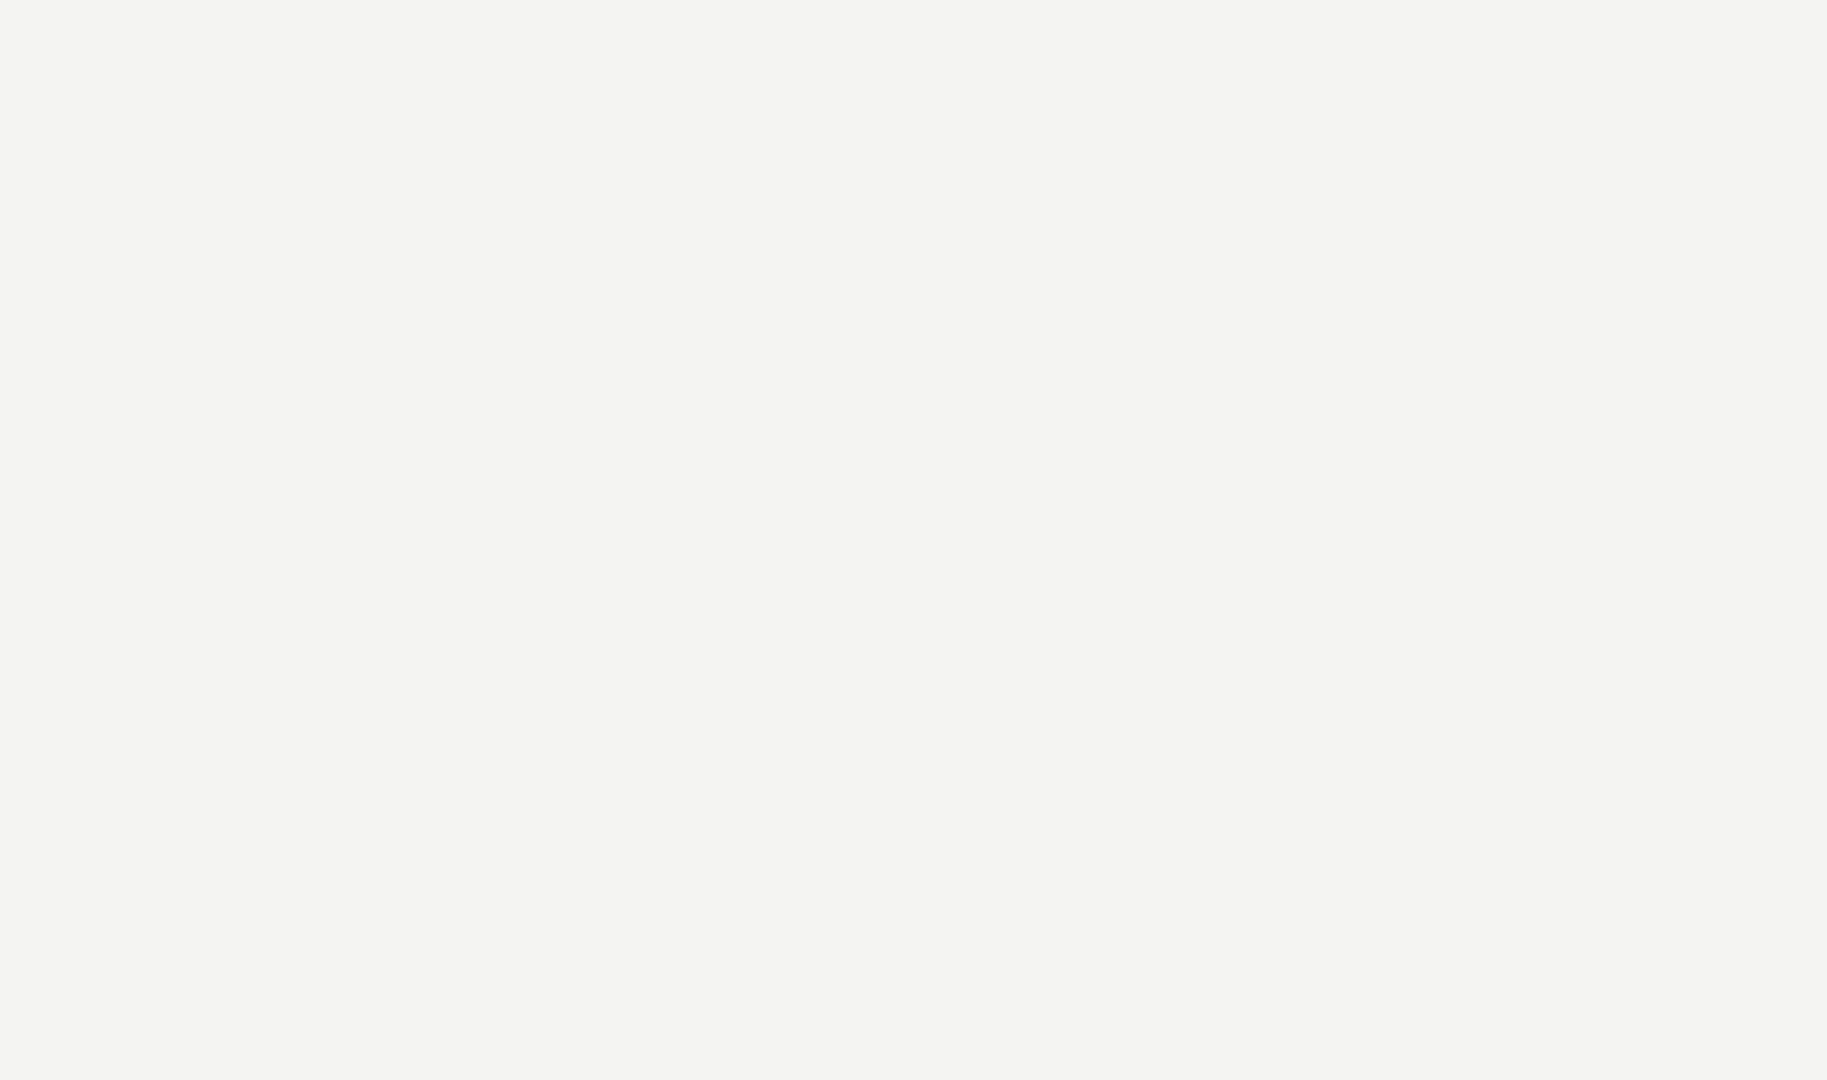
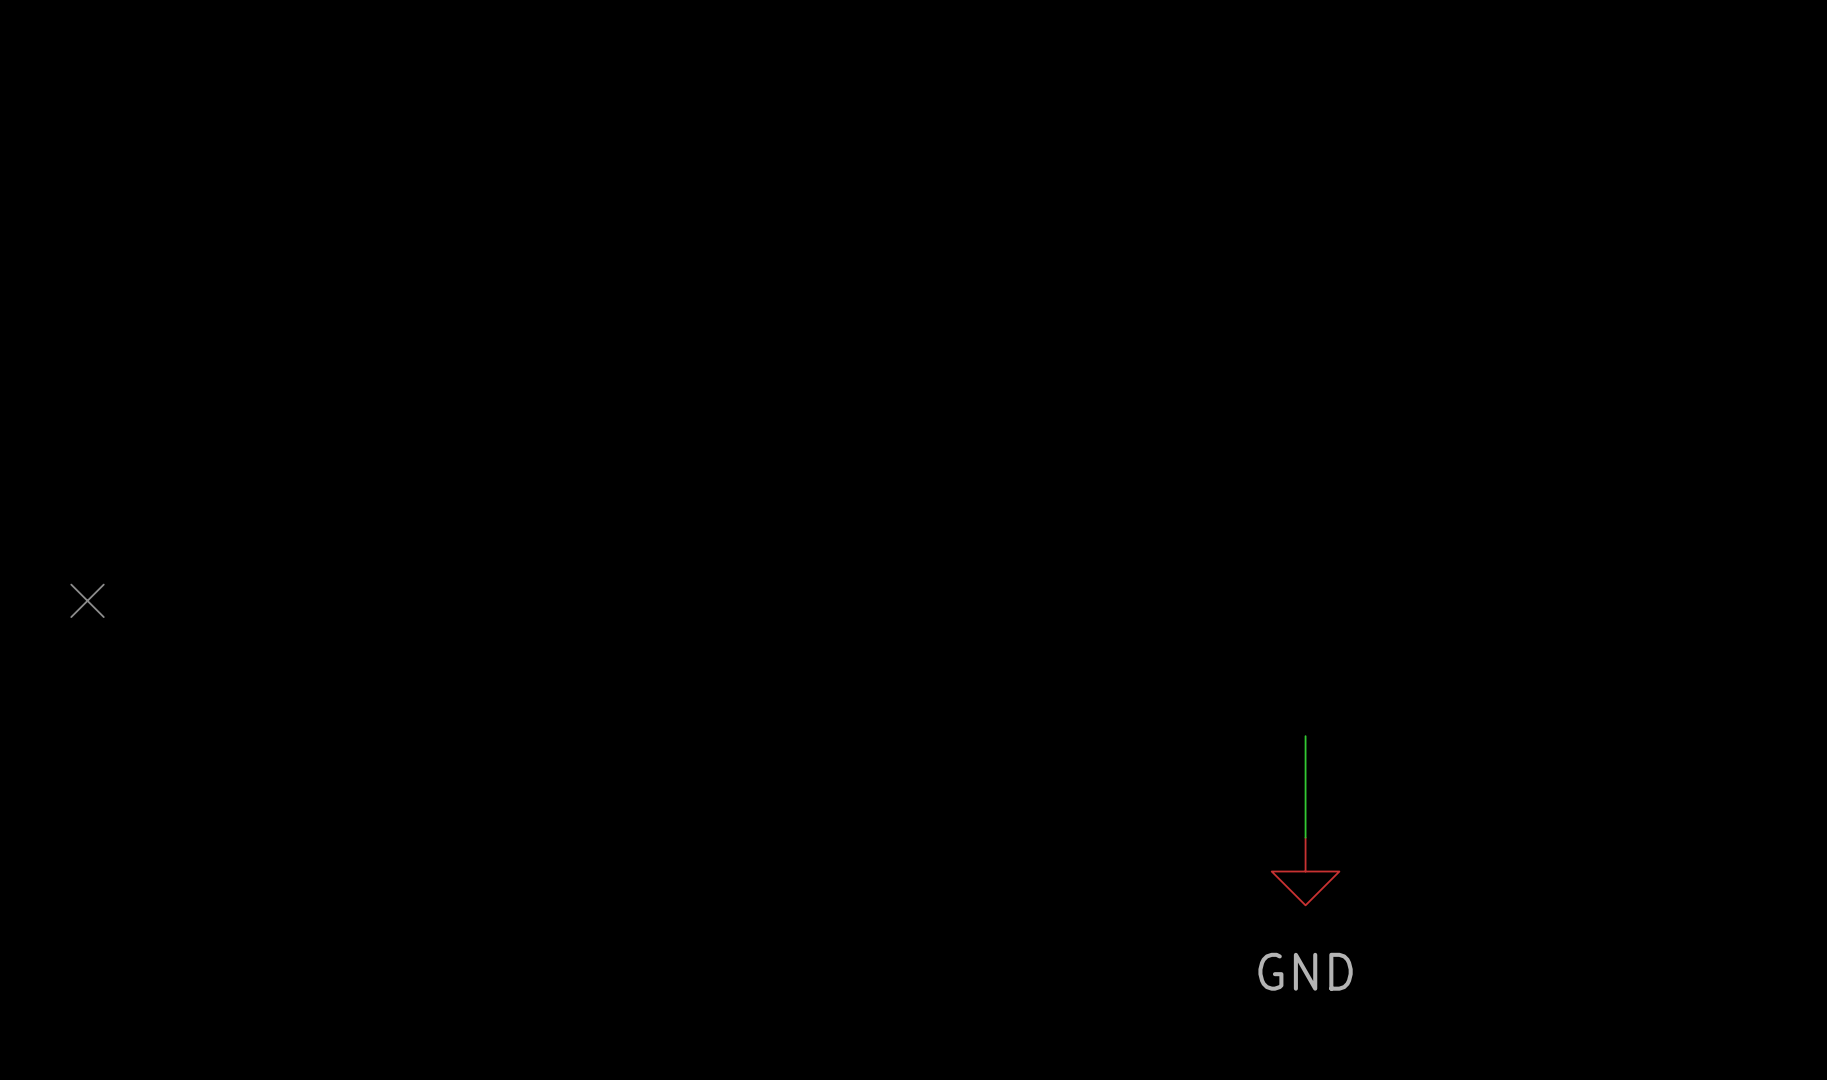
no-connect mark: none -> (87, 600)
wire: none -> (1305, 736) (1305, 837)
power symbol: none -> GND (1305, 871)

